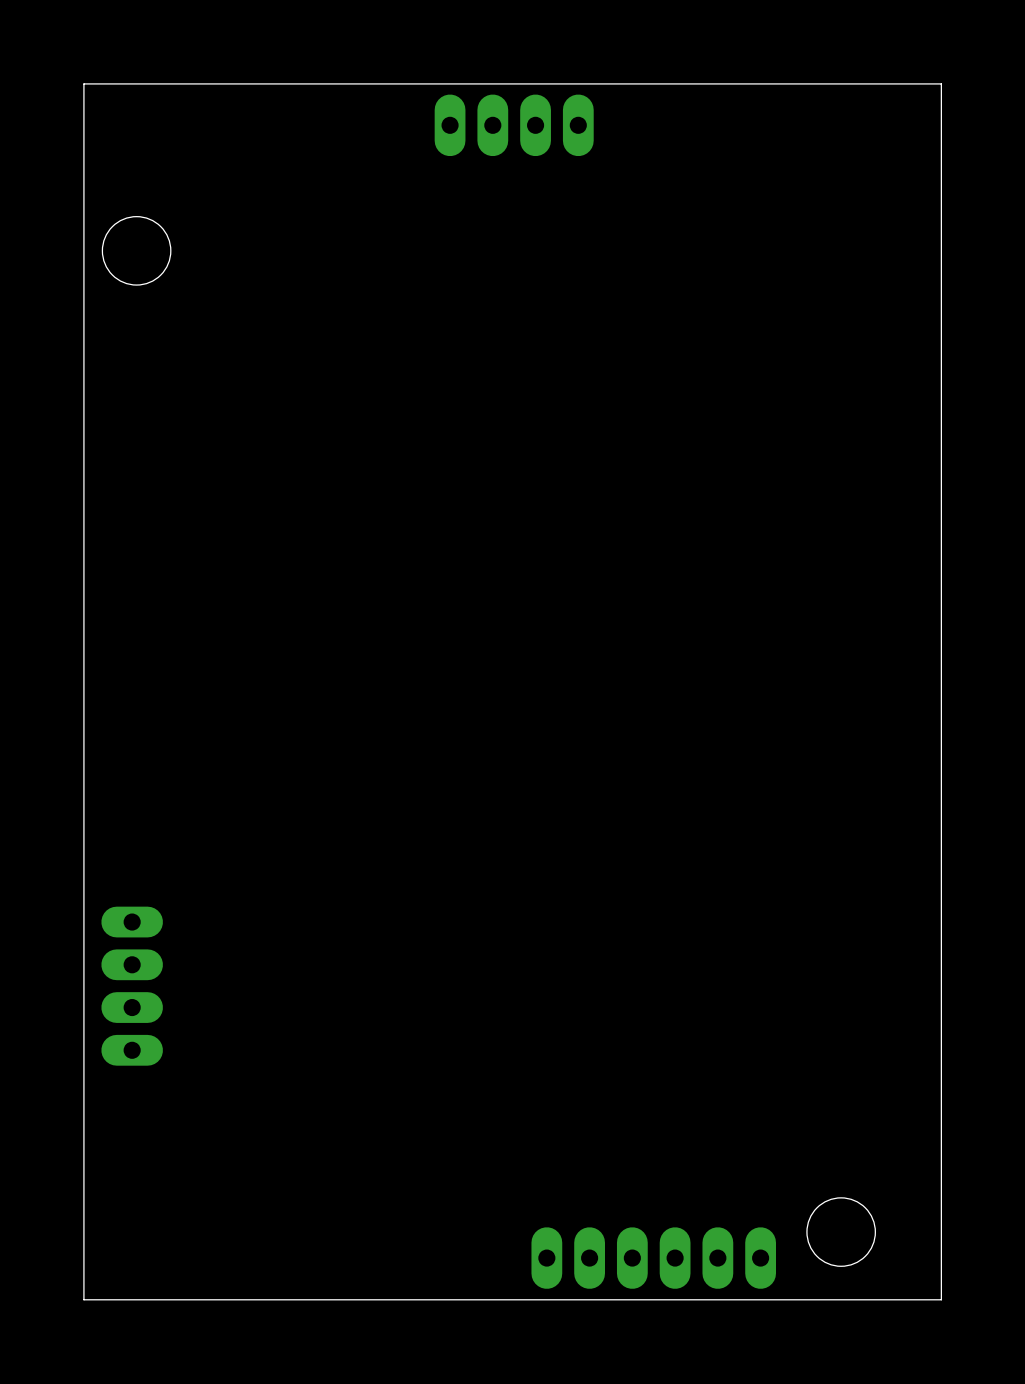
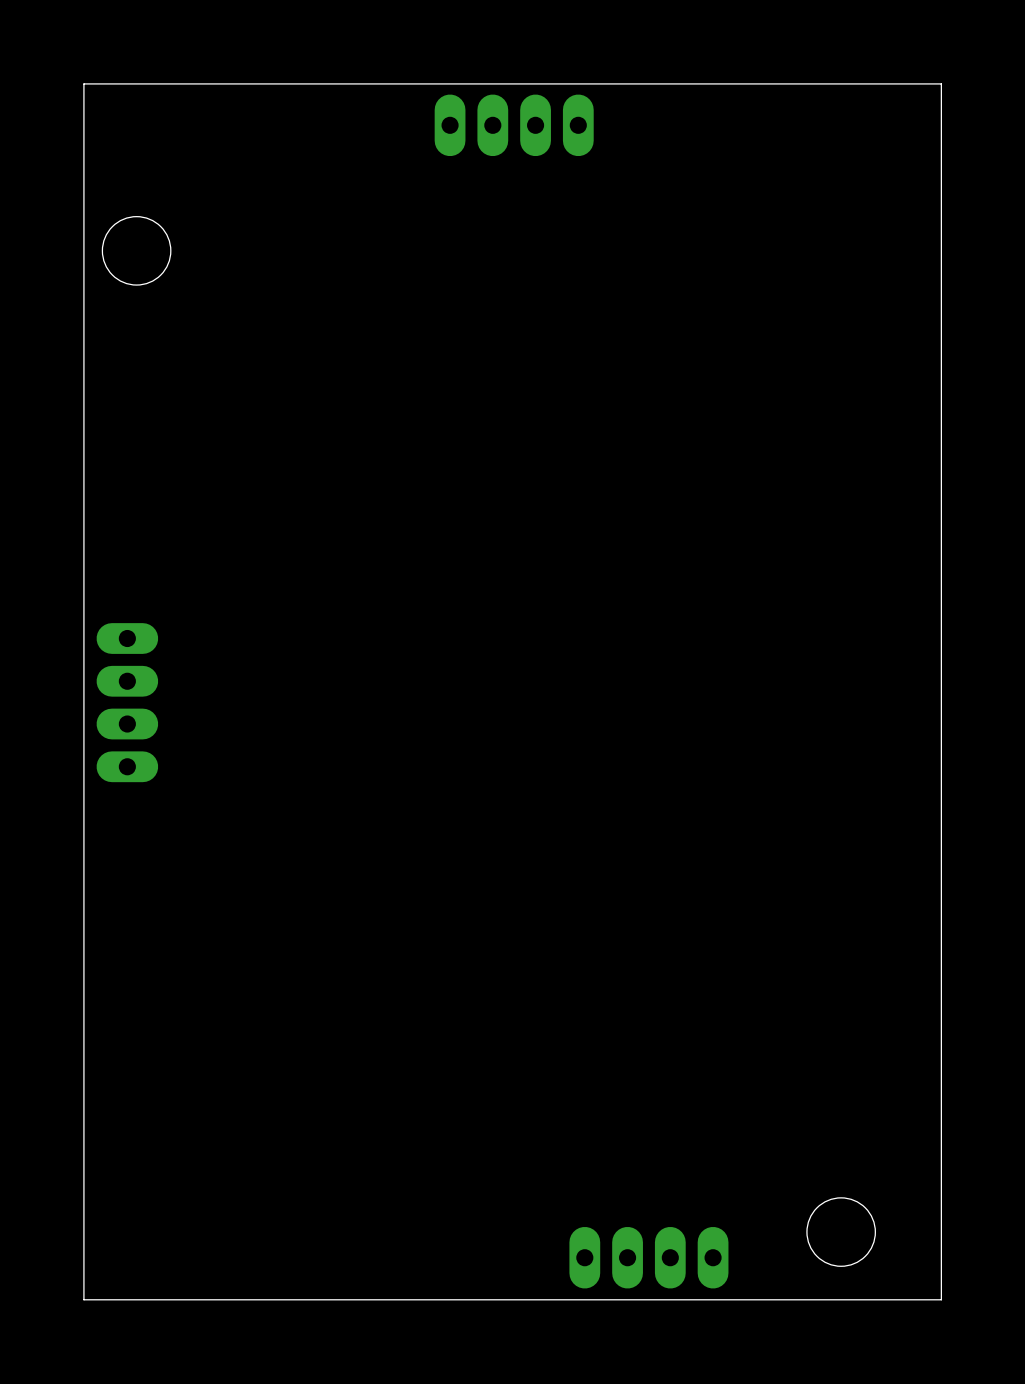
part position: (132, 986) -> (127, 702)
part footprint: [531, 1227, 777, 1289] -> [569, 1226, 729, 1289]

